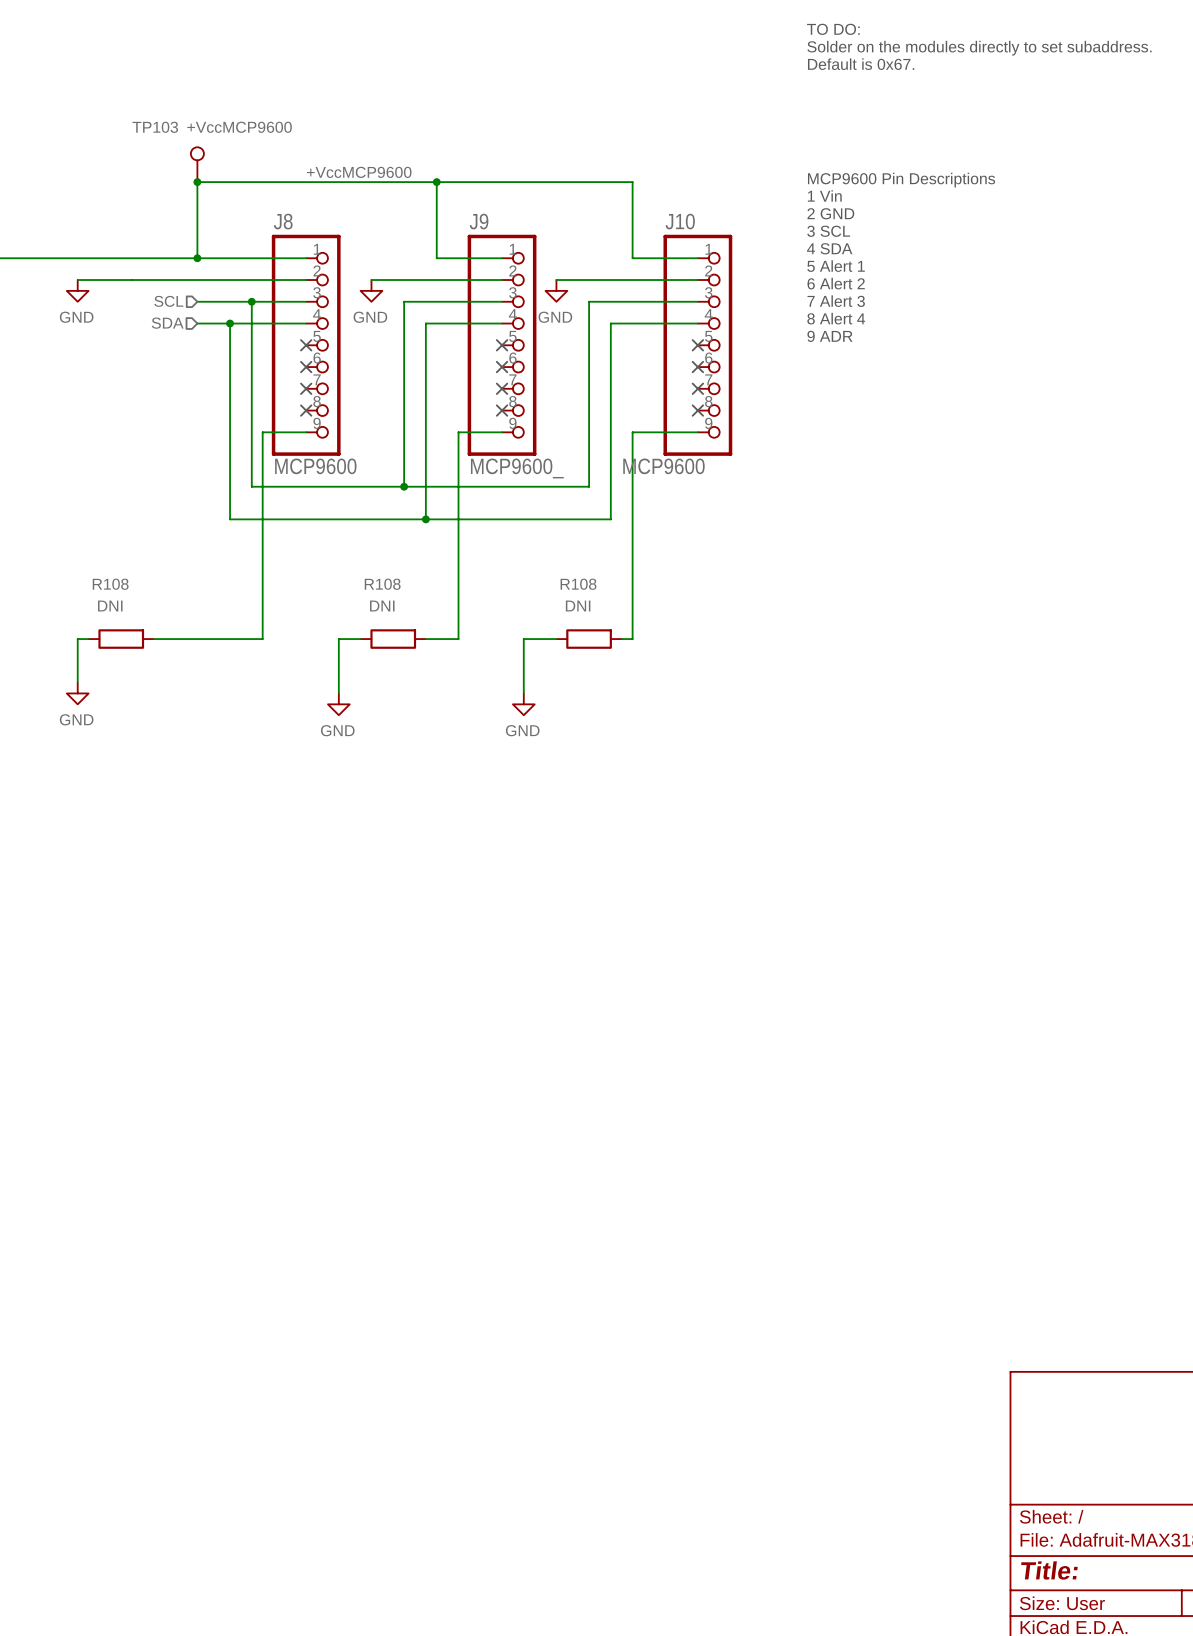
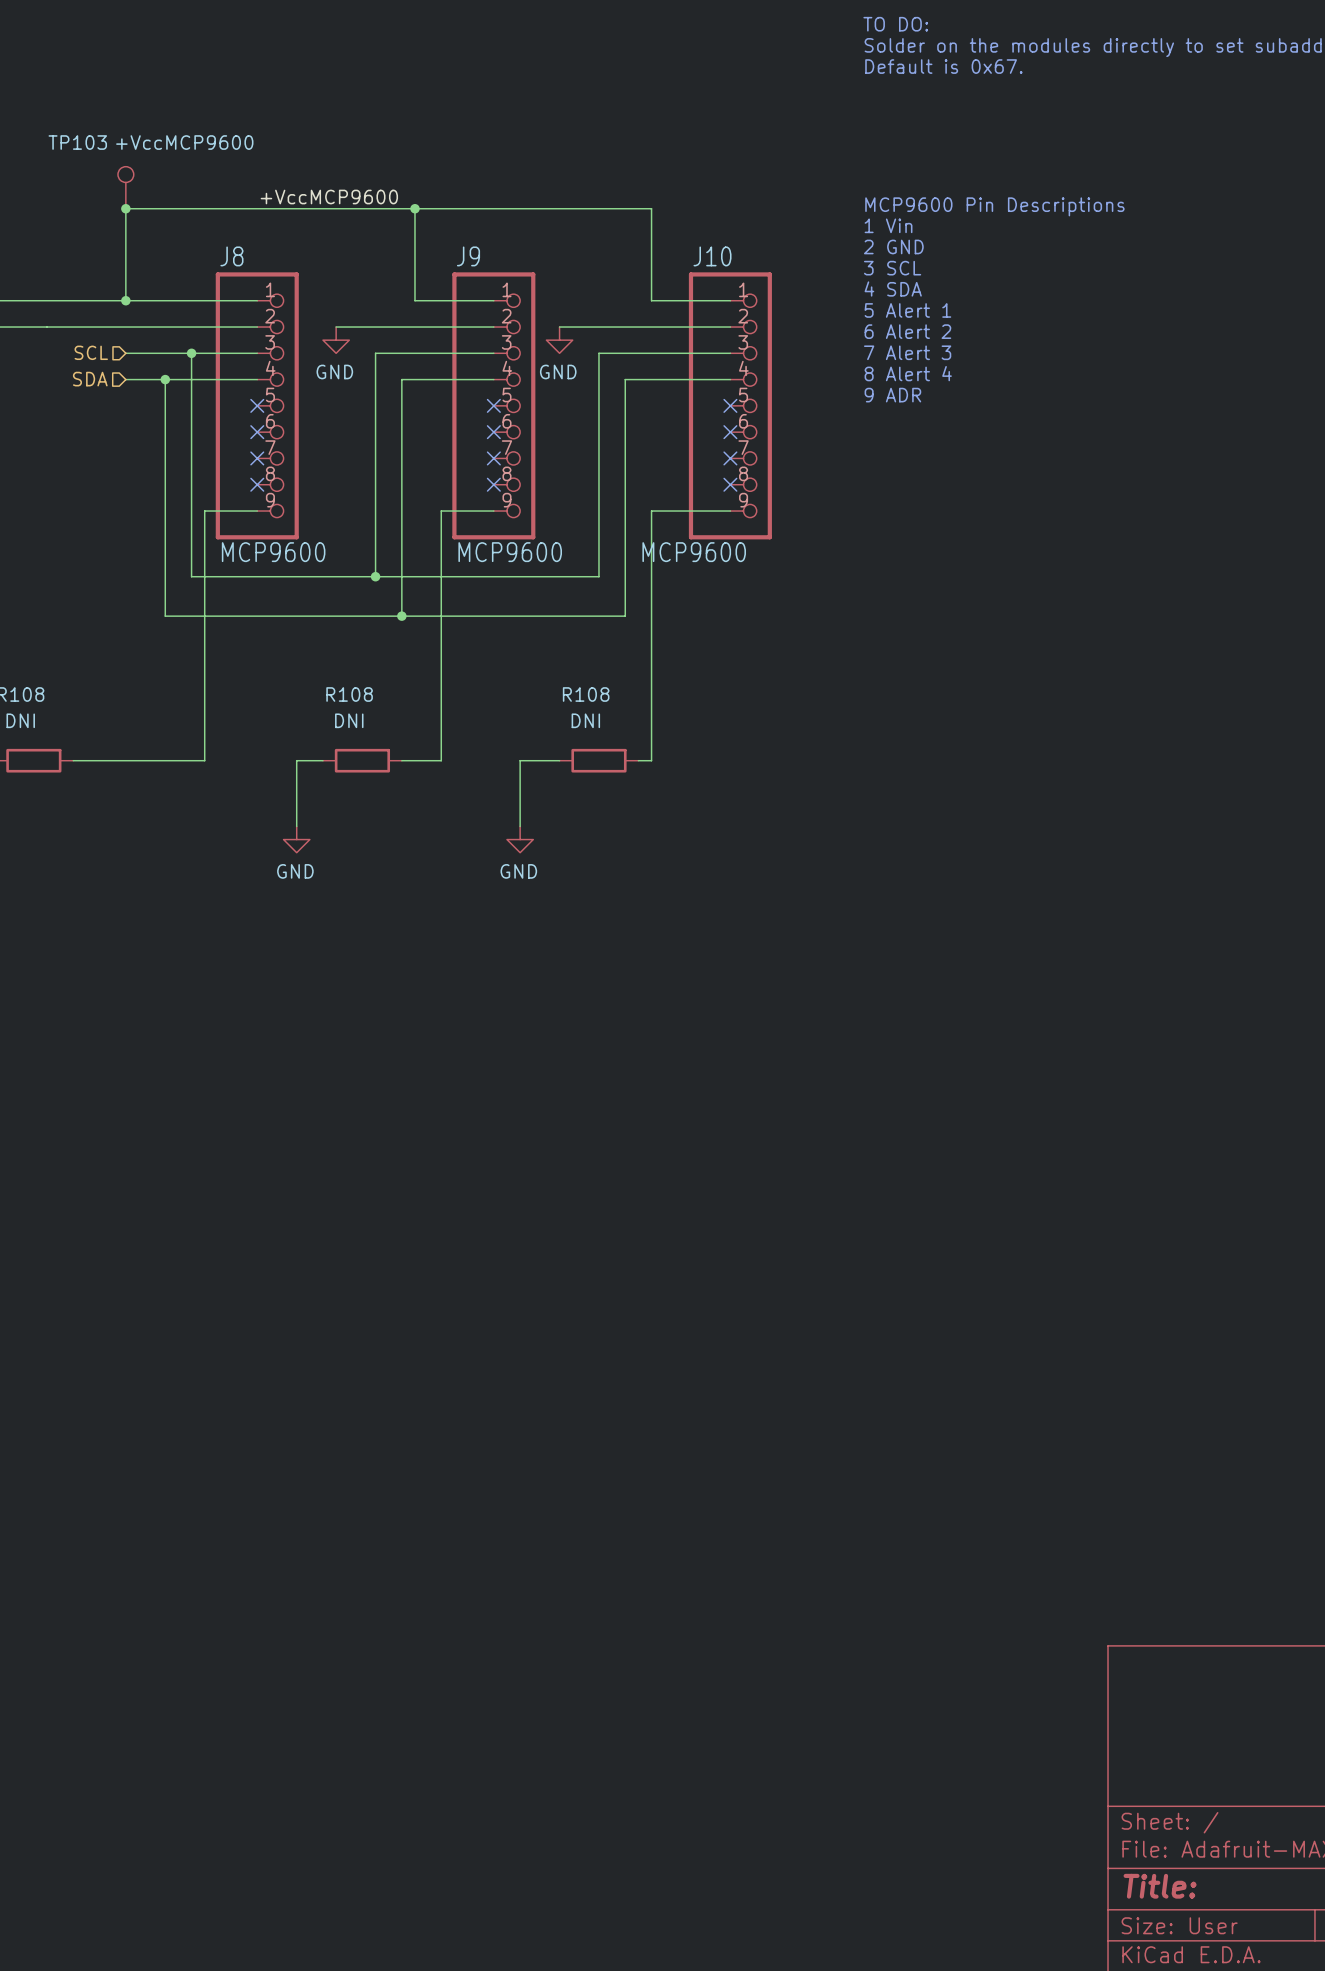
J9 value: MCP9600_ (517, 468) -> MCP9600 (510, 552)

